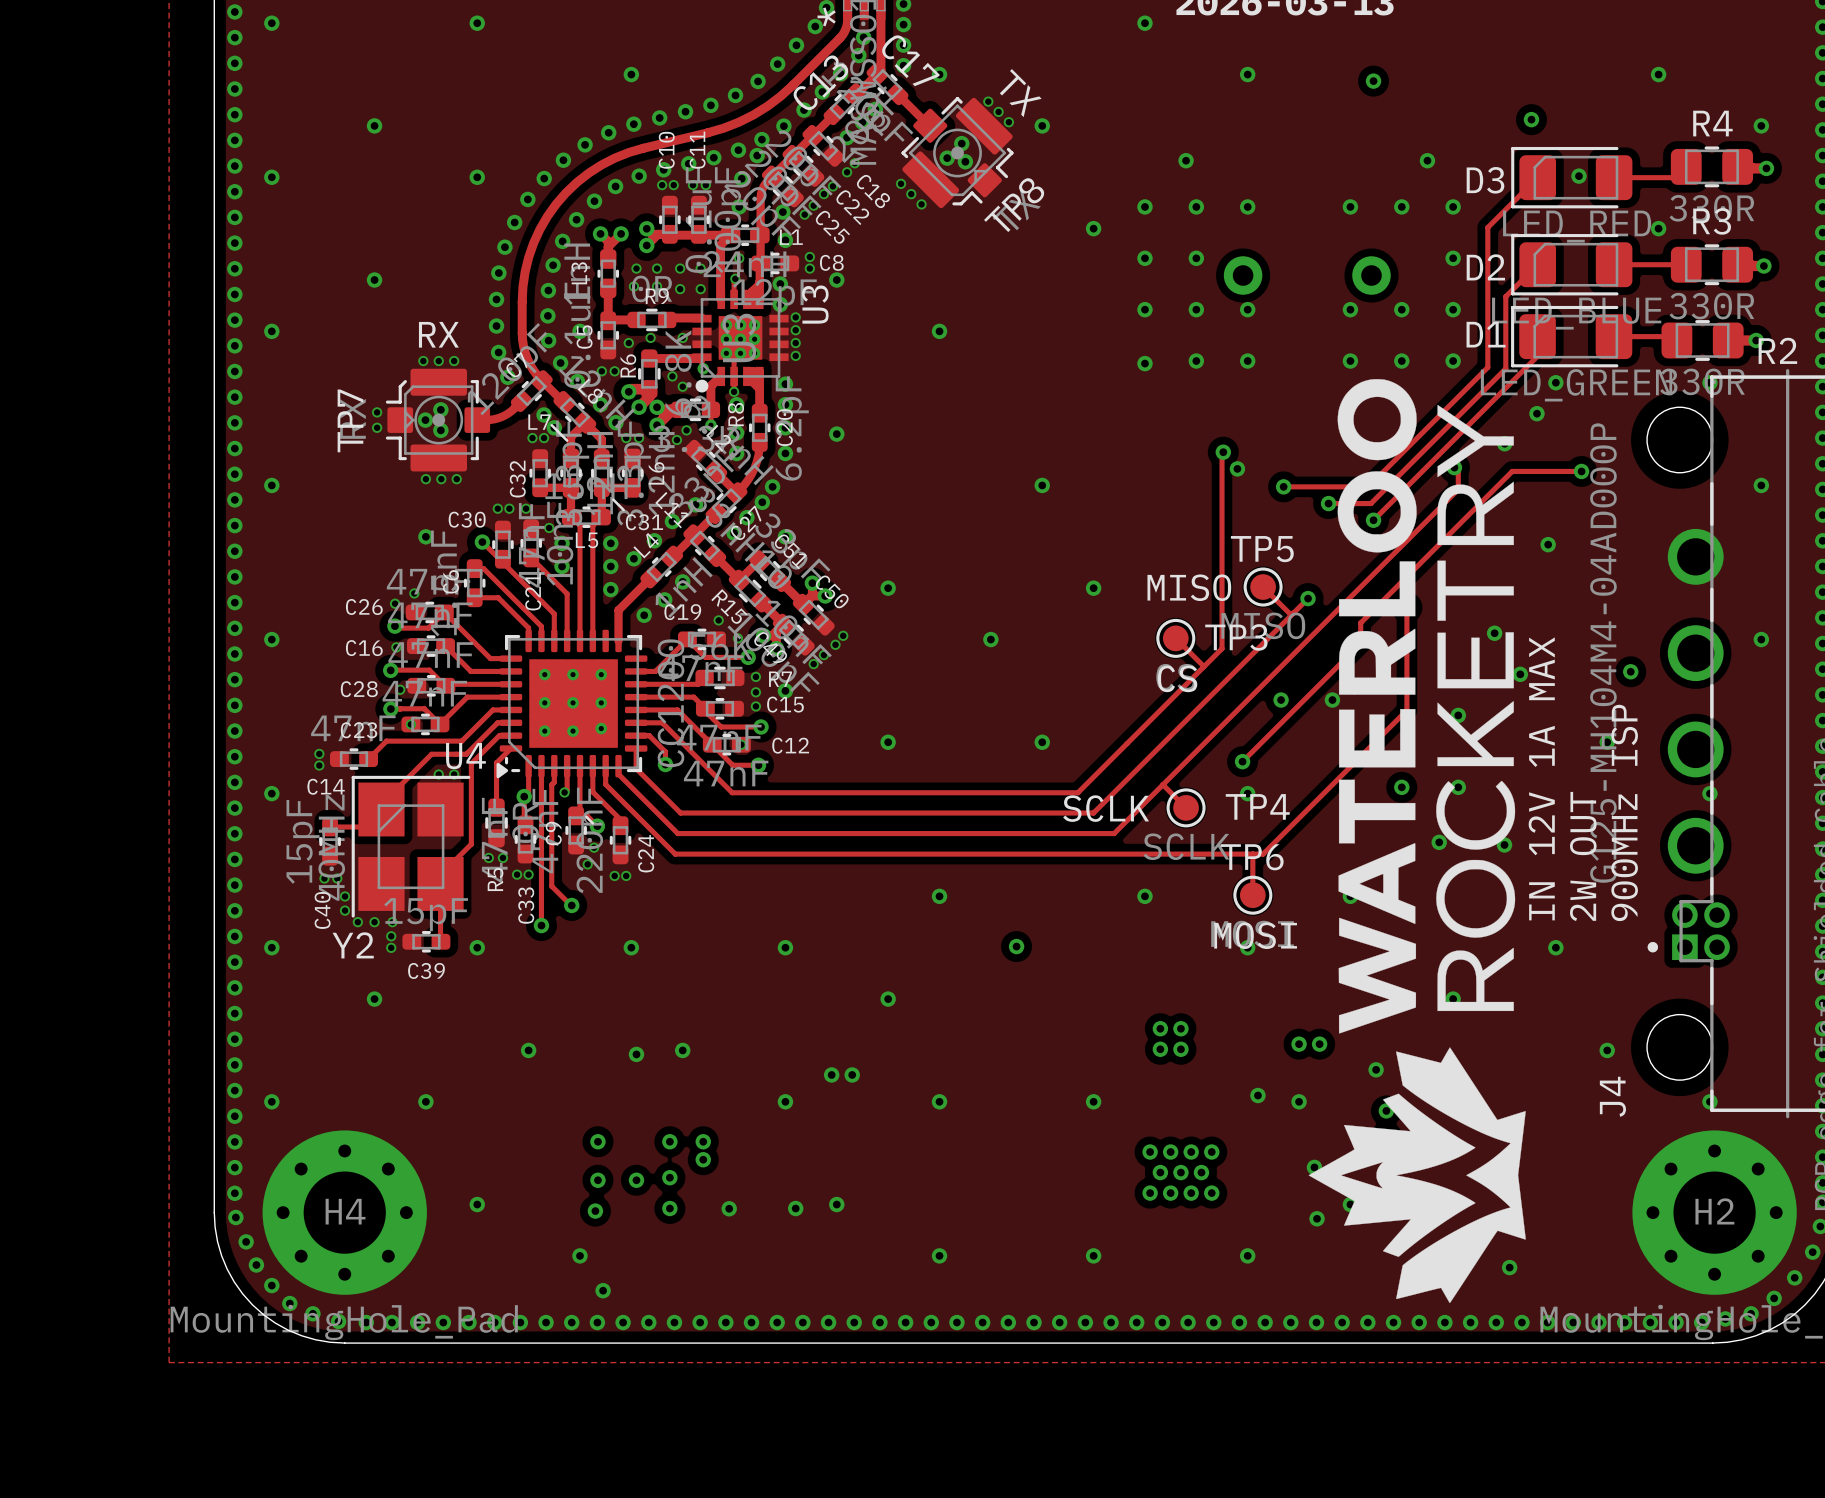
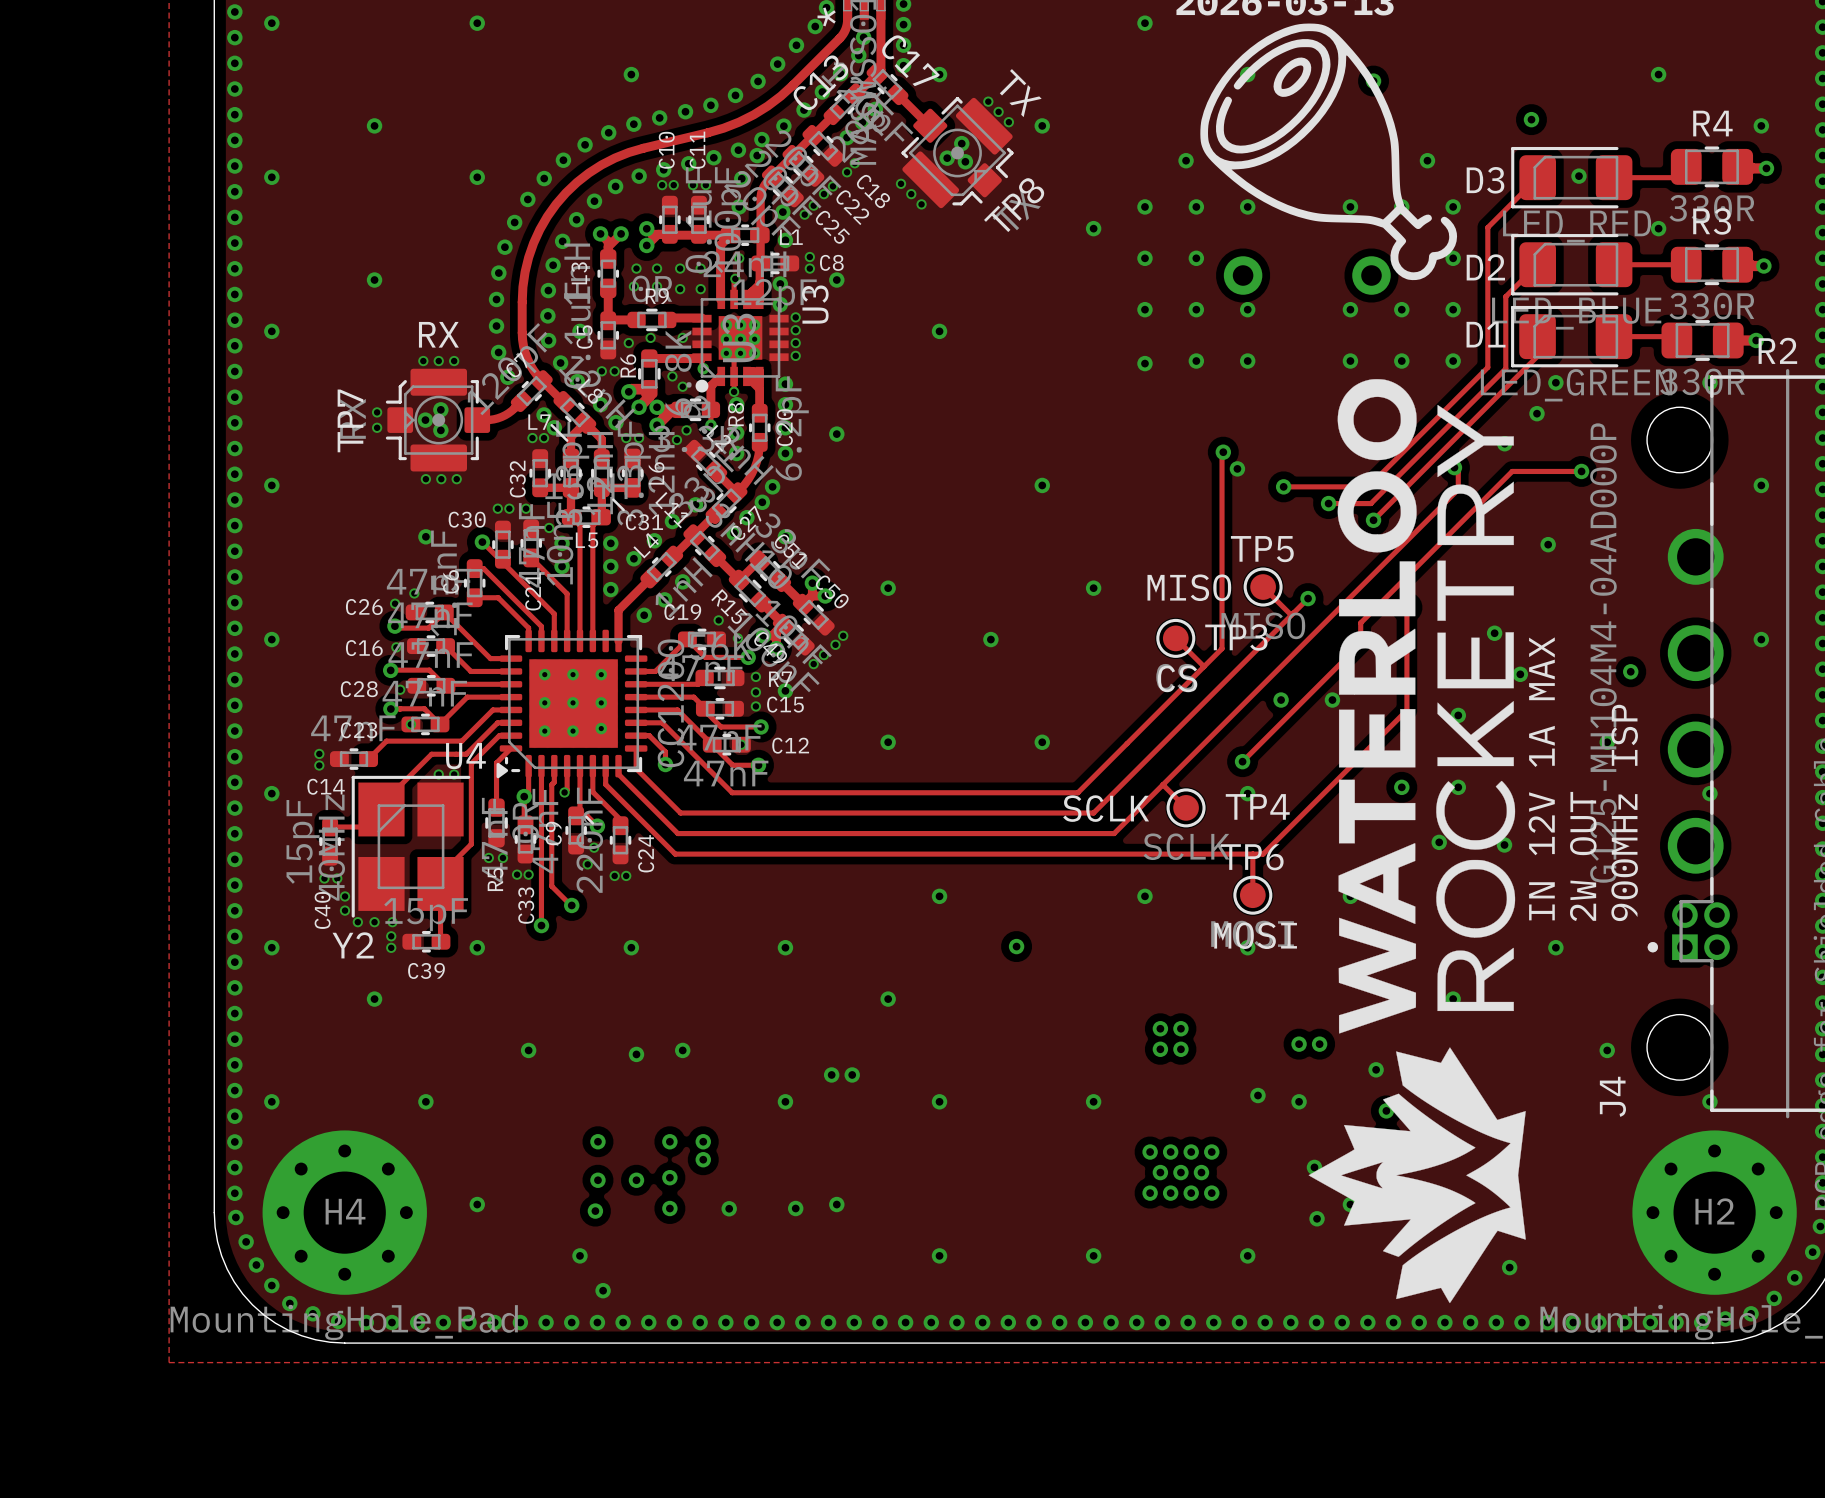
drawing: none -> [1200, 23, 1458, 281]

